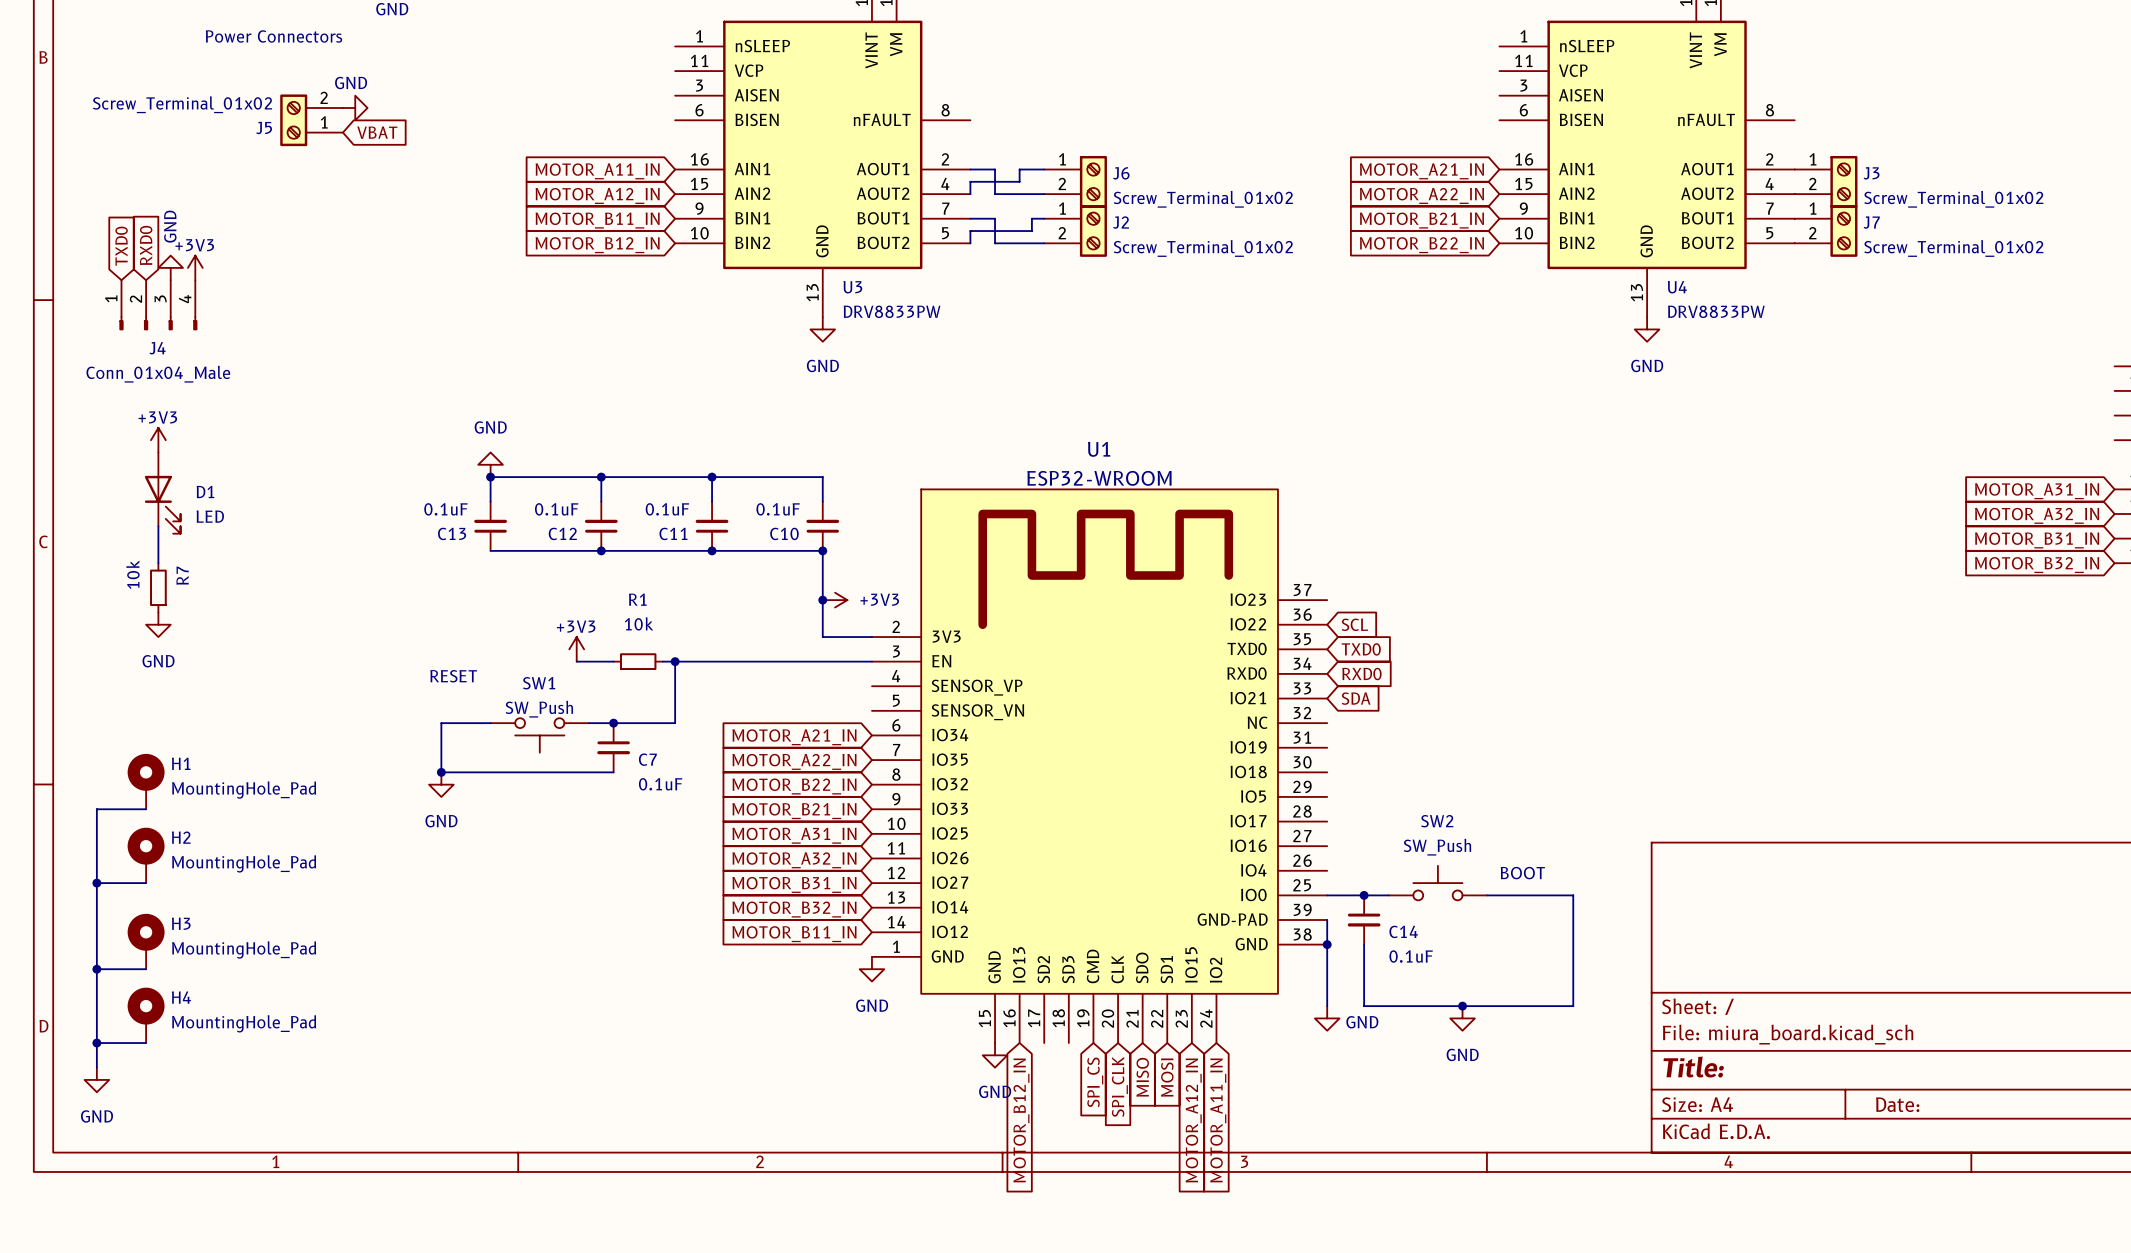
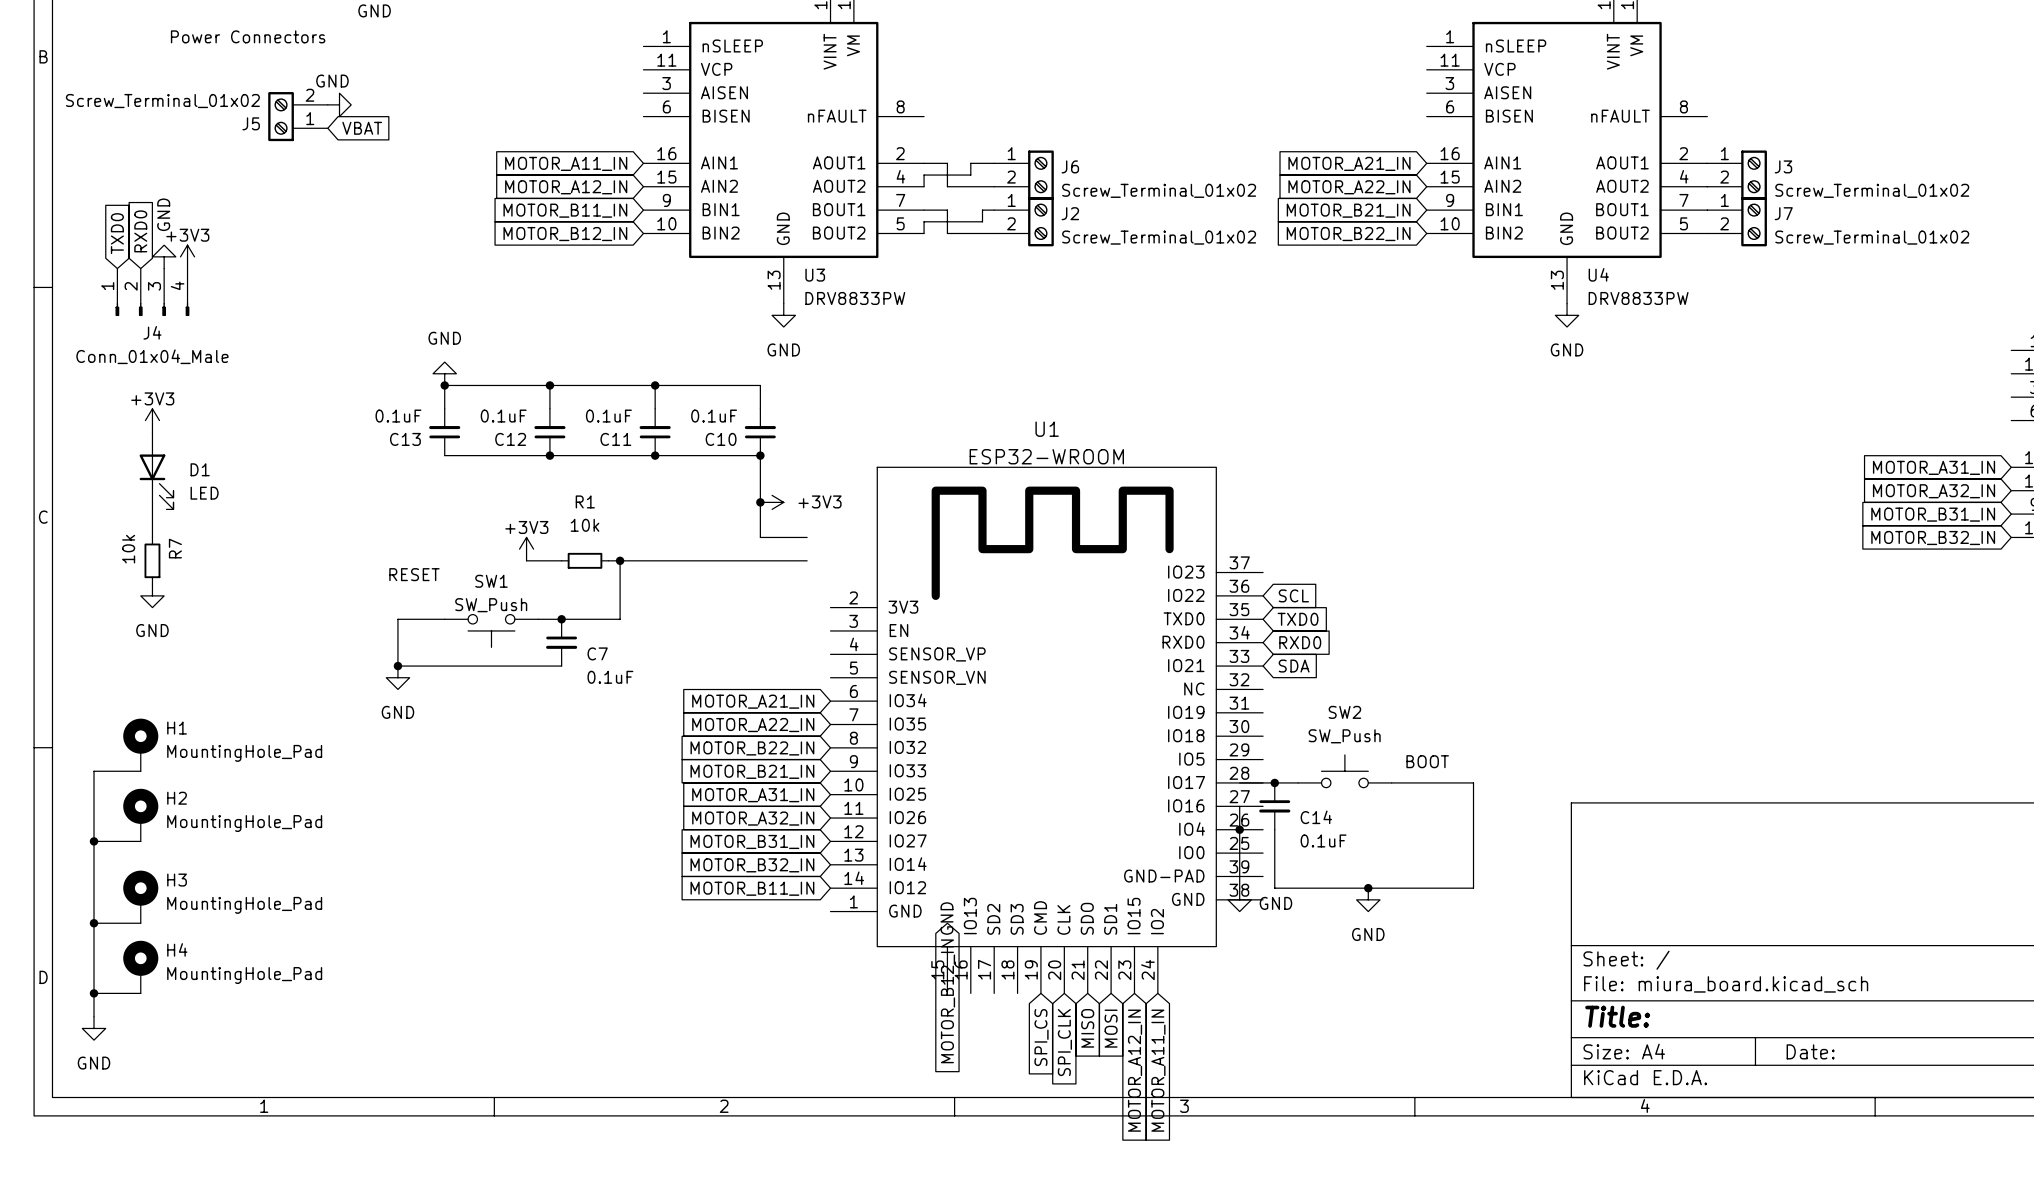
junction: none -> (444, 385)
junction: none -> (549, 385)
junction: none -> (655, 385)
wire: none -> (444, 408) (444, 385) (760, 385) (760, 408)
power symbol position: GND (490, 464) -> GND (444, 373)
wire: (490, 477) (490, 501) -> (468, 455) (444, 455)
junction: (490, 477) -> none
wire: (601, 477) (601, 501) -> (549, 385) (549, 408)
junction position: (601, 477) -> (549, 455)
wire: (712, 477) (712, 501) -> (655, 385) (655, 408)
junction position: (712, 477) -> (655, 455)
wire: (798, 477) (822, 477) (822, 501) -> (760, 455) (760, 537) (807, 537)
junction: none -> (760, 455)
C13 position: (490, 526) -> (444, 432)
C12 position: (601, 526) -> (549, 432)
C11 position: (712, 526) -> (655, 432)
C10 position: (822, 526) -> (760, 432)
wire: (490, 550) (822, 550) (822, 637) (871, 637) -> none
junction: (601, 550) -> none
junction: (712, 550) -> none
junction position: (822, 550) -> (760, 502)
junction: none -> (620, 560)
junction: (822, 600) -> none
power symbol position: +3V3 (835, 600) -> +3V3 (772, 502)
power symbol position: +3V3 (576, 649) -> +3V3 (526, 549)
junction: none -> (561, 619)
wire: (576, 661) (613, 661) -> (526, 560) (561, 560)
R1 position: (638, 661) -> (585, 560)
wire: (662, 661) (871, 661) -> (608, 560) (807, 560)
wire: (675, 661) (675, 723) (589, 723) -> (620, 560) (620, 619) (538, 619)
junction: (675, 661) -> none
text position: RESET (453, 676) -> RESET (414, 574)
junction: none -> (397, 666)
wire: (490, 723) (441, 723) (441, 772) (613, 772) -> (444, 619) (397, 619) (397, 666) (561, 666)
junction: (613, 723) -> none
SW1 position: (539, 735) -> (491, 630)
C7 position: (613, 747) -> (561, 642)
junction: (441, 772) -> none
power symbol position: GND (441, 784) -> GND (397, 677)
junction: none -> (1274, 782)
junction: none -> (1239, 829)
text position: BOOT (1522, 873) -> BOOT (1427, 761)
SW2 position: (1437, 883) -> (1344, 771)
wire: (1327, 895) (1388, 895) -> (1239, 782) (1298, 782)
junction: (1364, 895) -> none
wire: (1487, 895) (1573, 895) (1573, 1006) (1364, 1006) (1364, 944) -> (1391, 782) (1473, 782) (1473, 888) (1274, 888) (1274, 829)
wire: (1327, 920) (1327, 1006) -> (1239, 806) (1239, 888)
C14 position: (1364, 920) -> (1274, 806)
junction: none -> (1368, 888)
power symbol: none -> GND (1239, 899)
junction: (1327, 944) -> none
power symbol: none -> GND (1368, 899)
power symbol: GND (871, 969) -> none
junction: (1462, 1006) -> none
power symbol: GND (1327, 1018) -> none
power symbol: GND (1462, 1018) -> none
power symbol: GND (995, 1055) -> none
global label position: MOTOR_B12_IN (1021, 1120) -> MOTOR_B12_IN (947, 1001)

